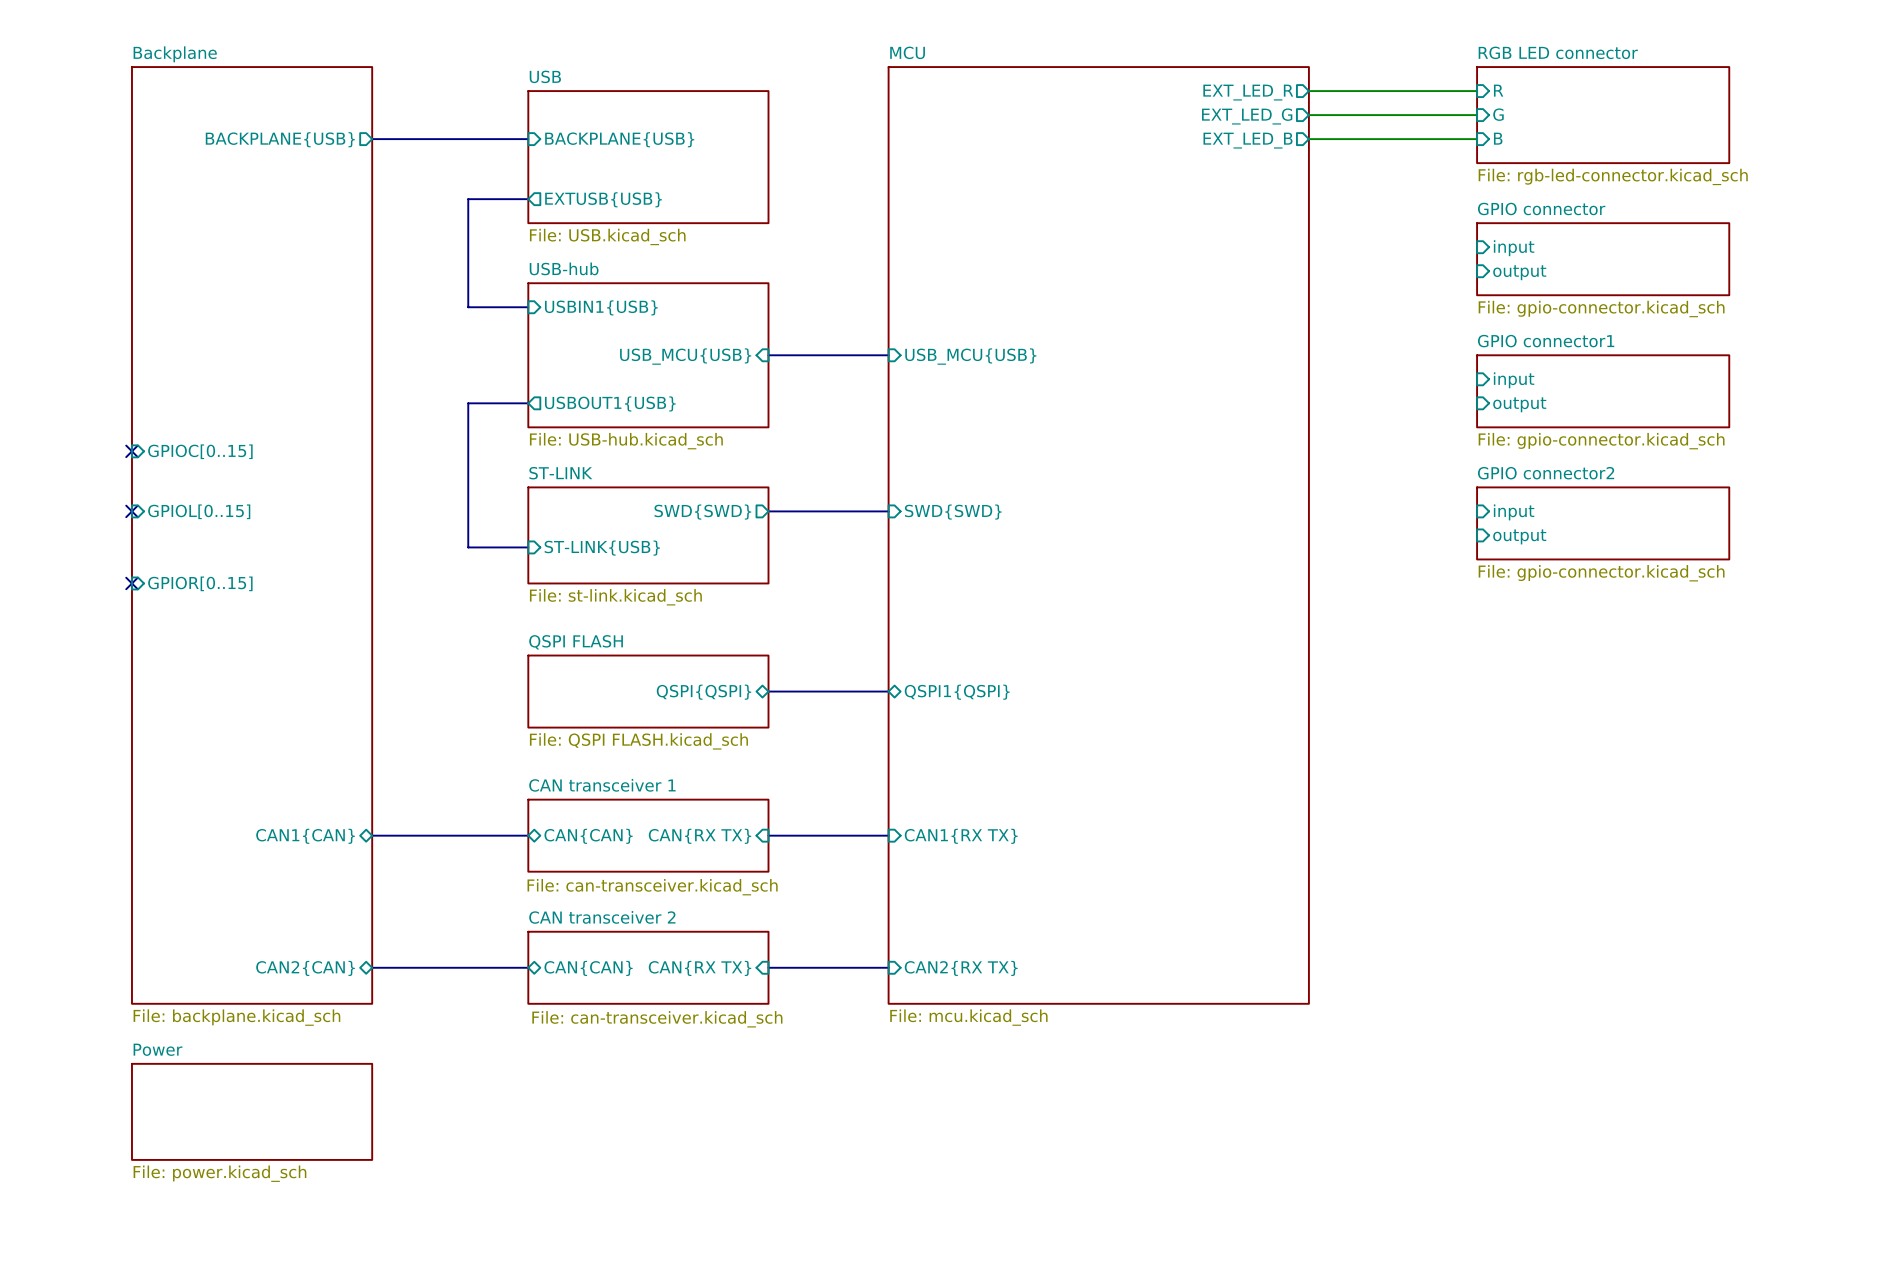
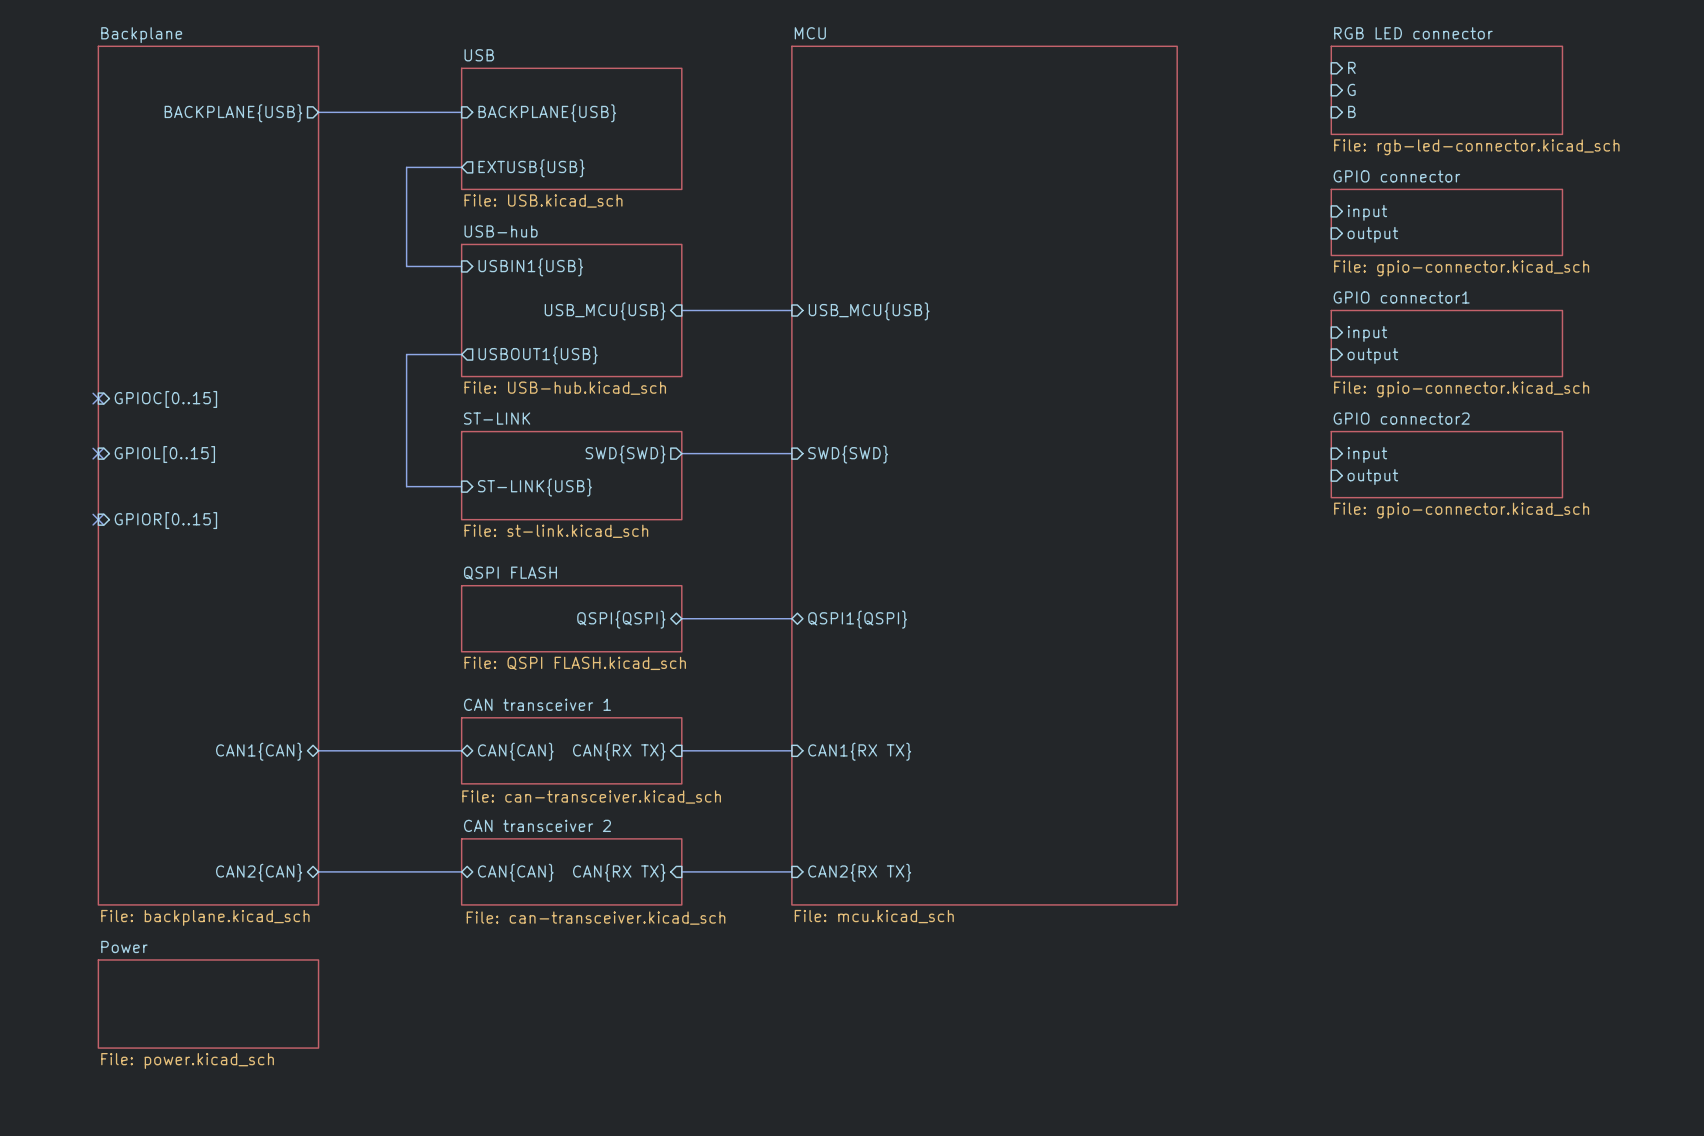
wire: (1308, 91) (1477, 91) -> none
sheet pin: EXT_LED_R (1248, 92) -> none
wire: (1308, 115) (1477, 115) -> none
sheet pin: EXT_LED_G (1247, 116) -> none
wire: (1308, 139) (1477, 139) -> none
sheet pin: EXT_LED_B (1248, 140) -> none

